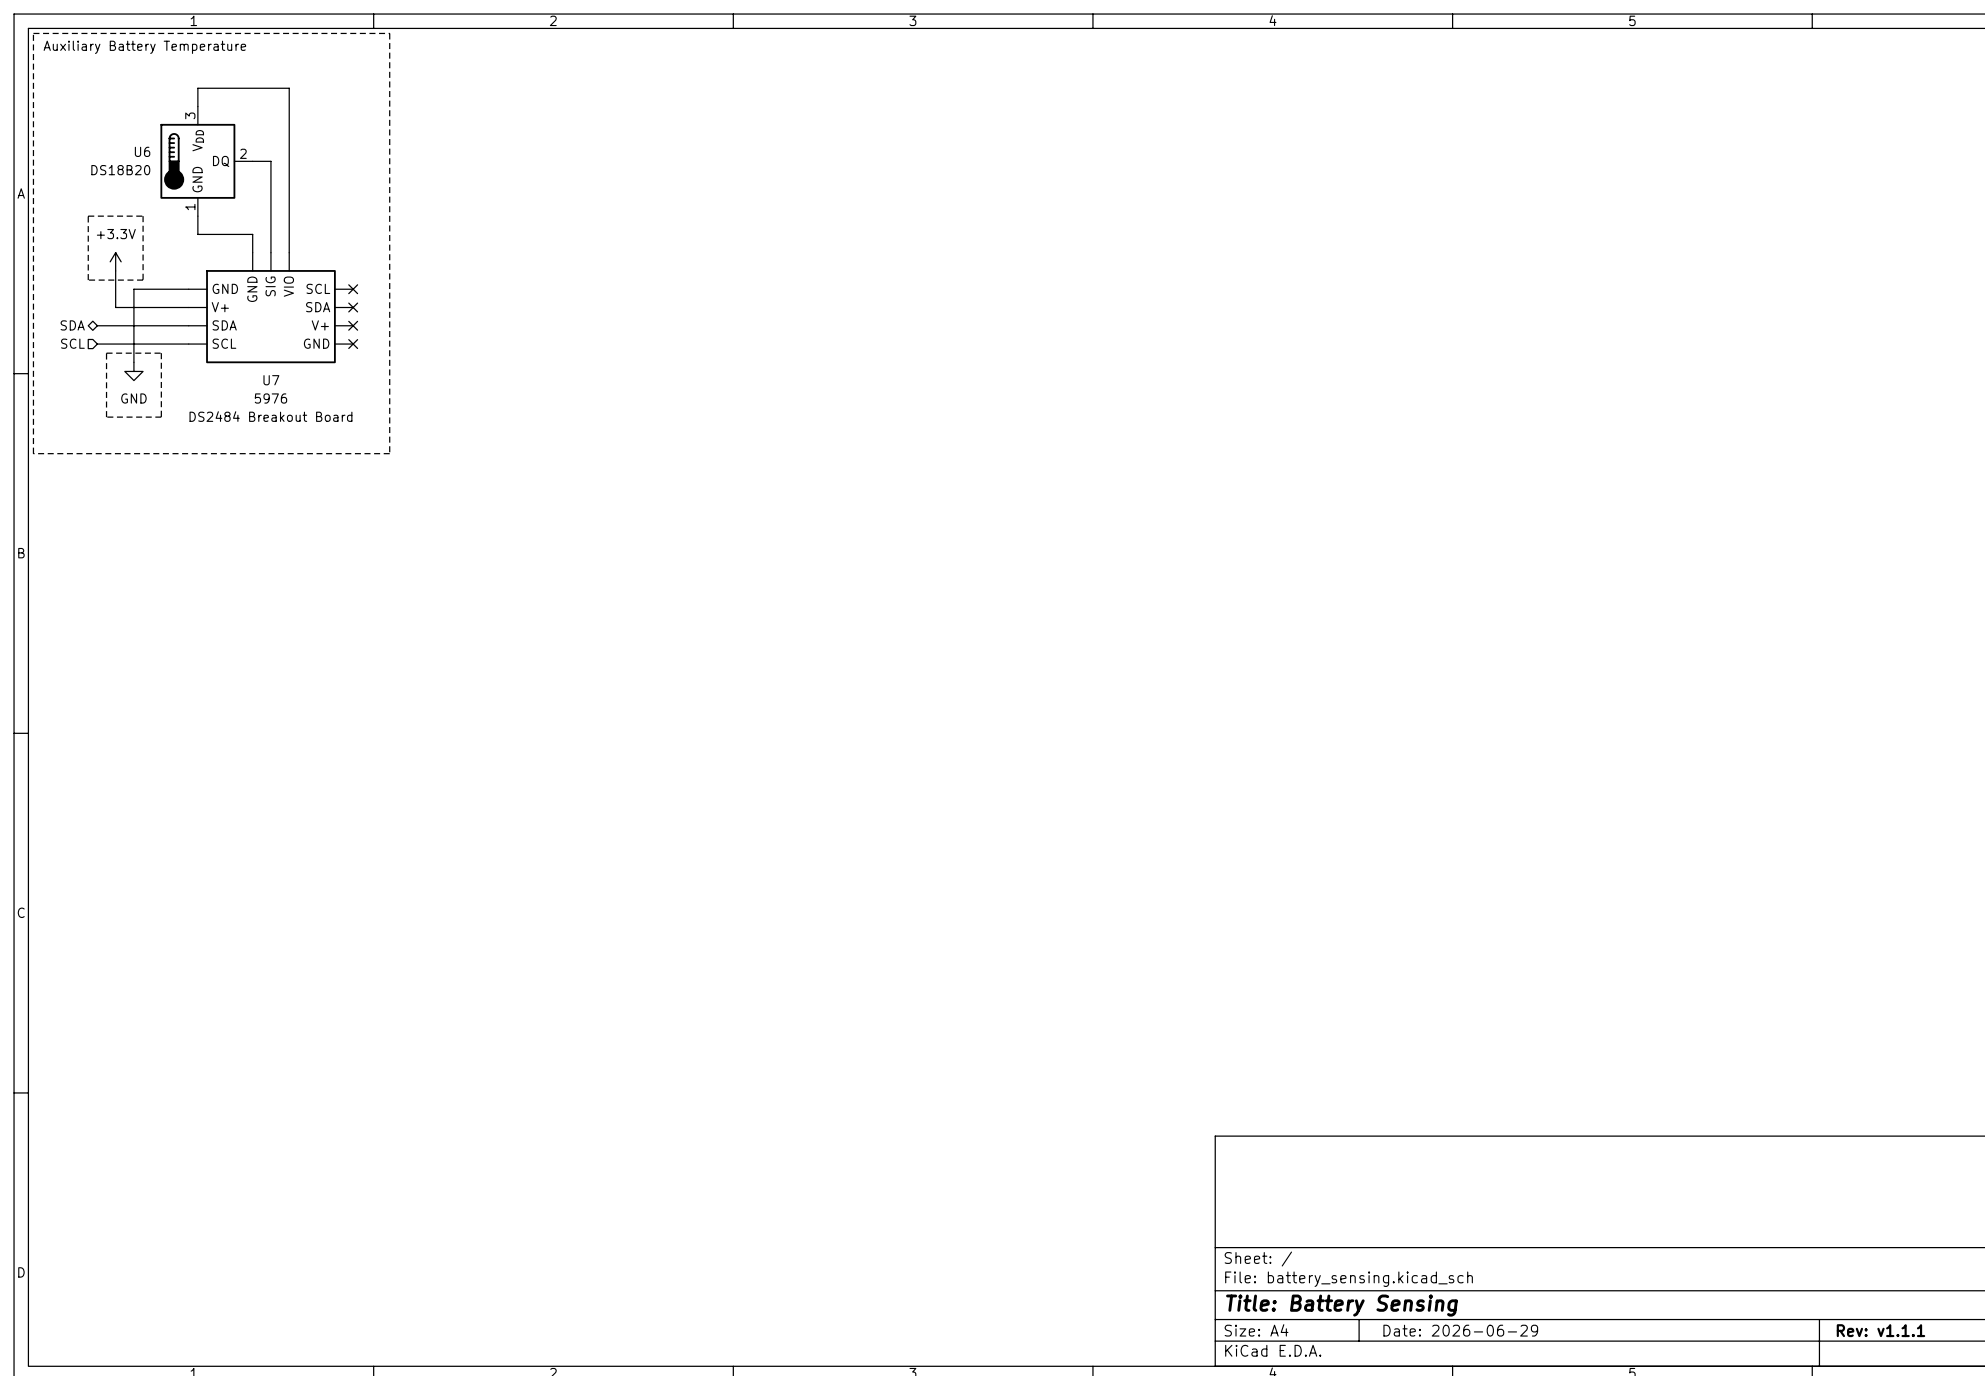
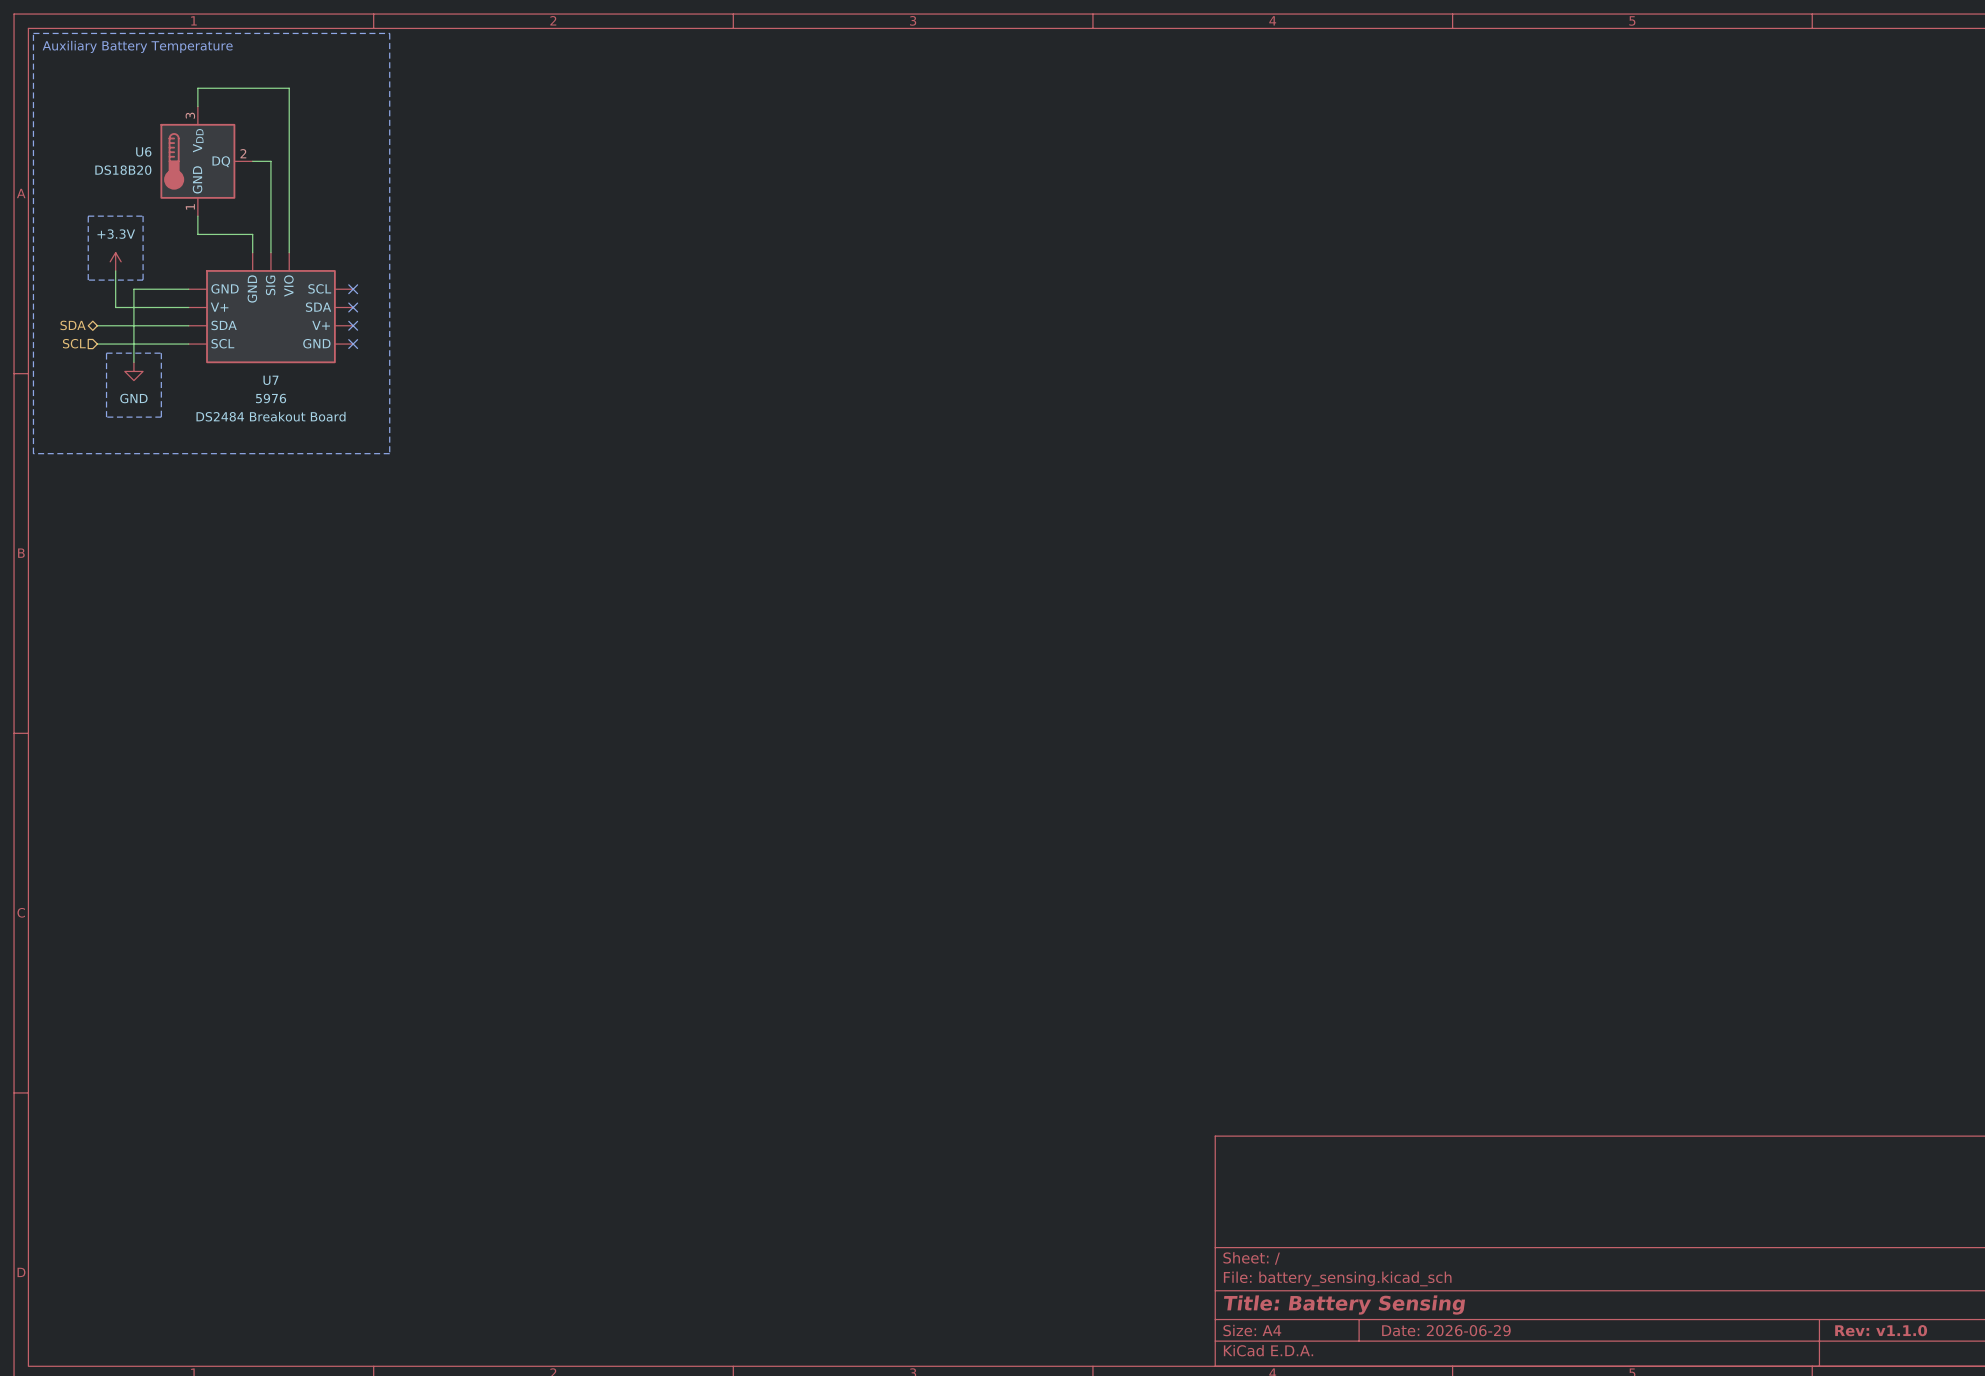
title block: Rev: v1.1.1 (1880, 1330) -> Rev: v1.1.0 (1881, 1330)

